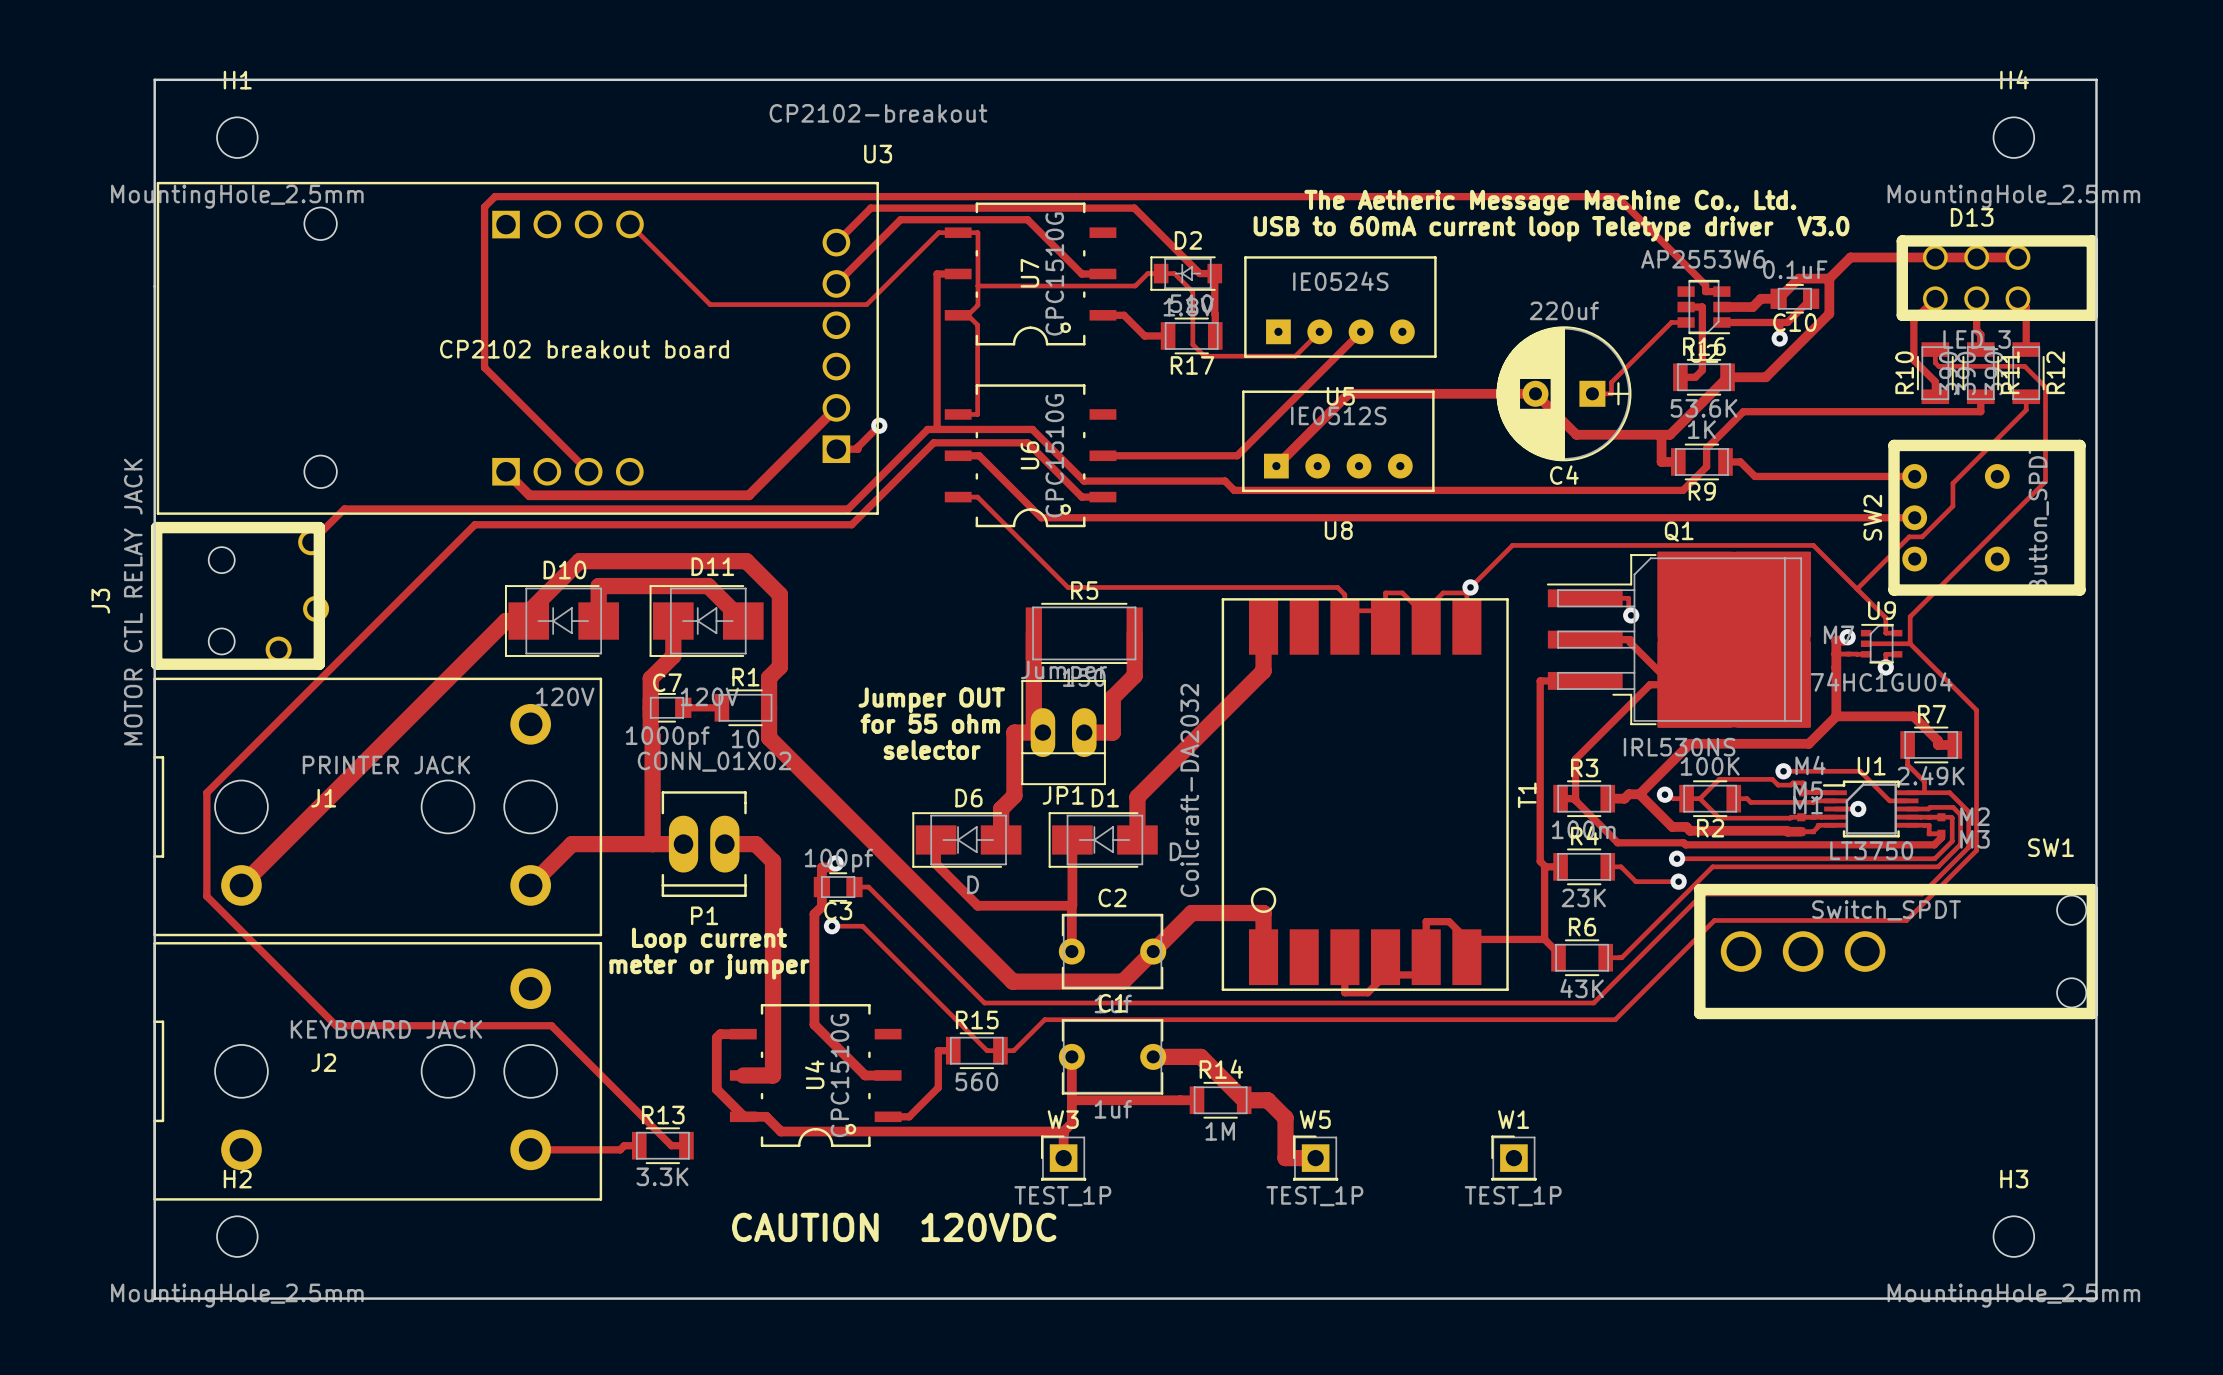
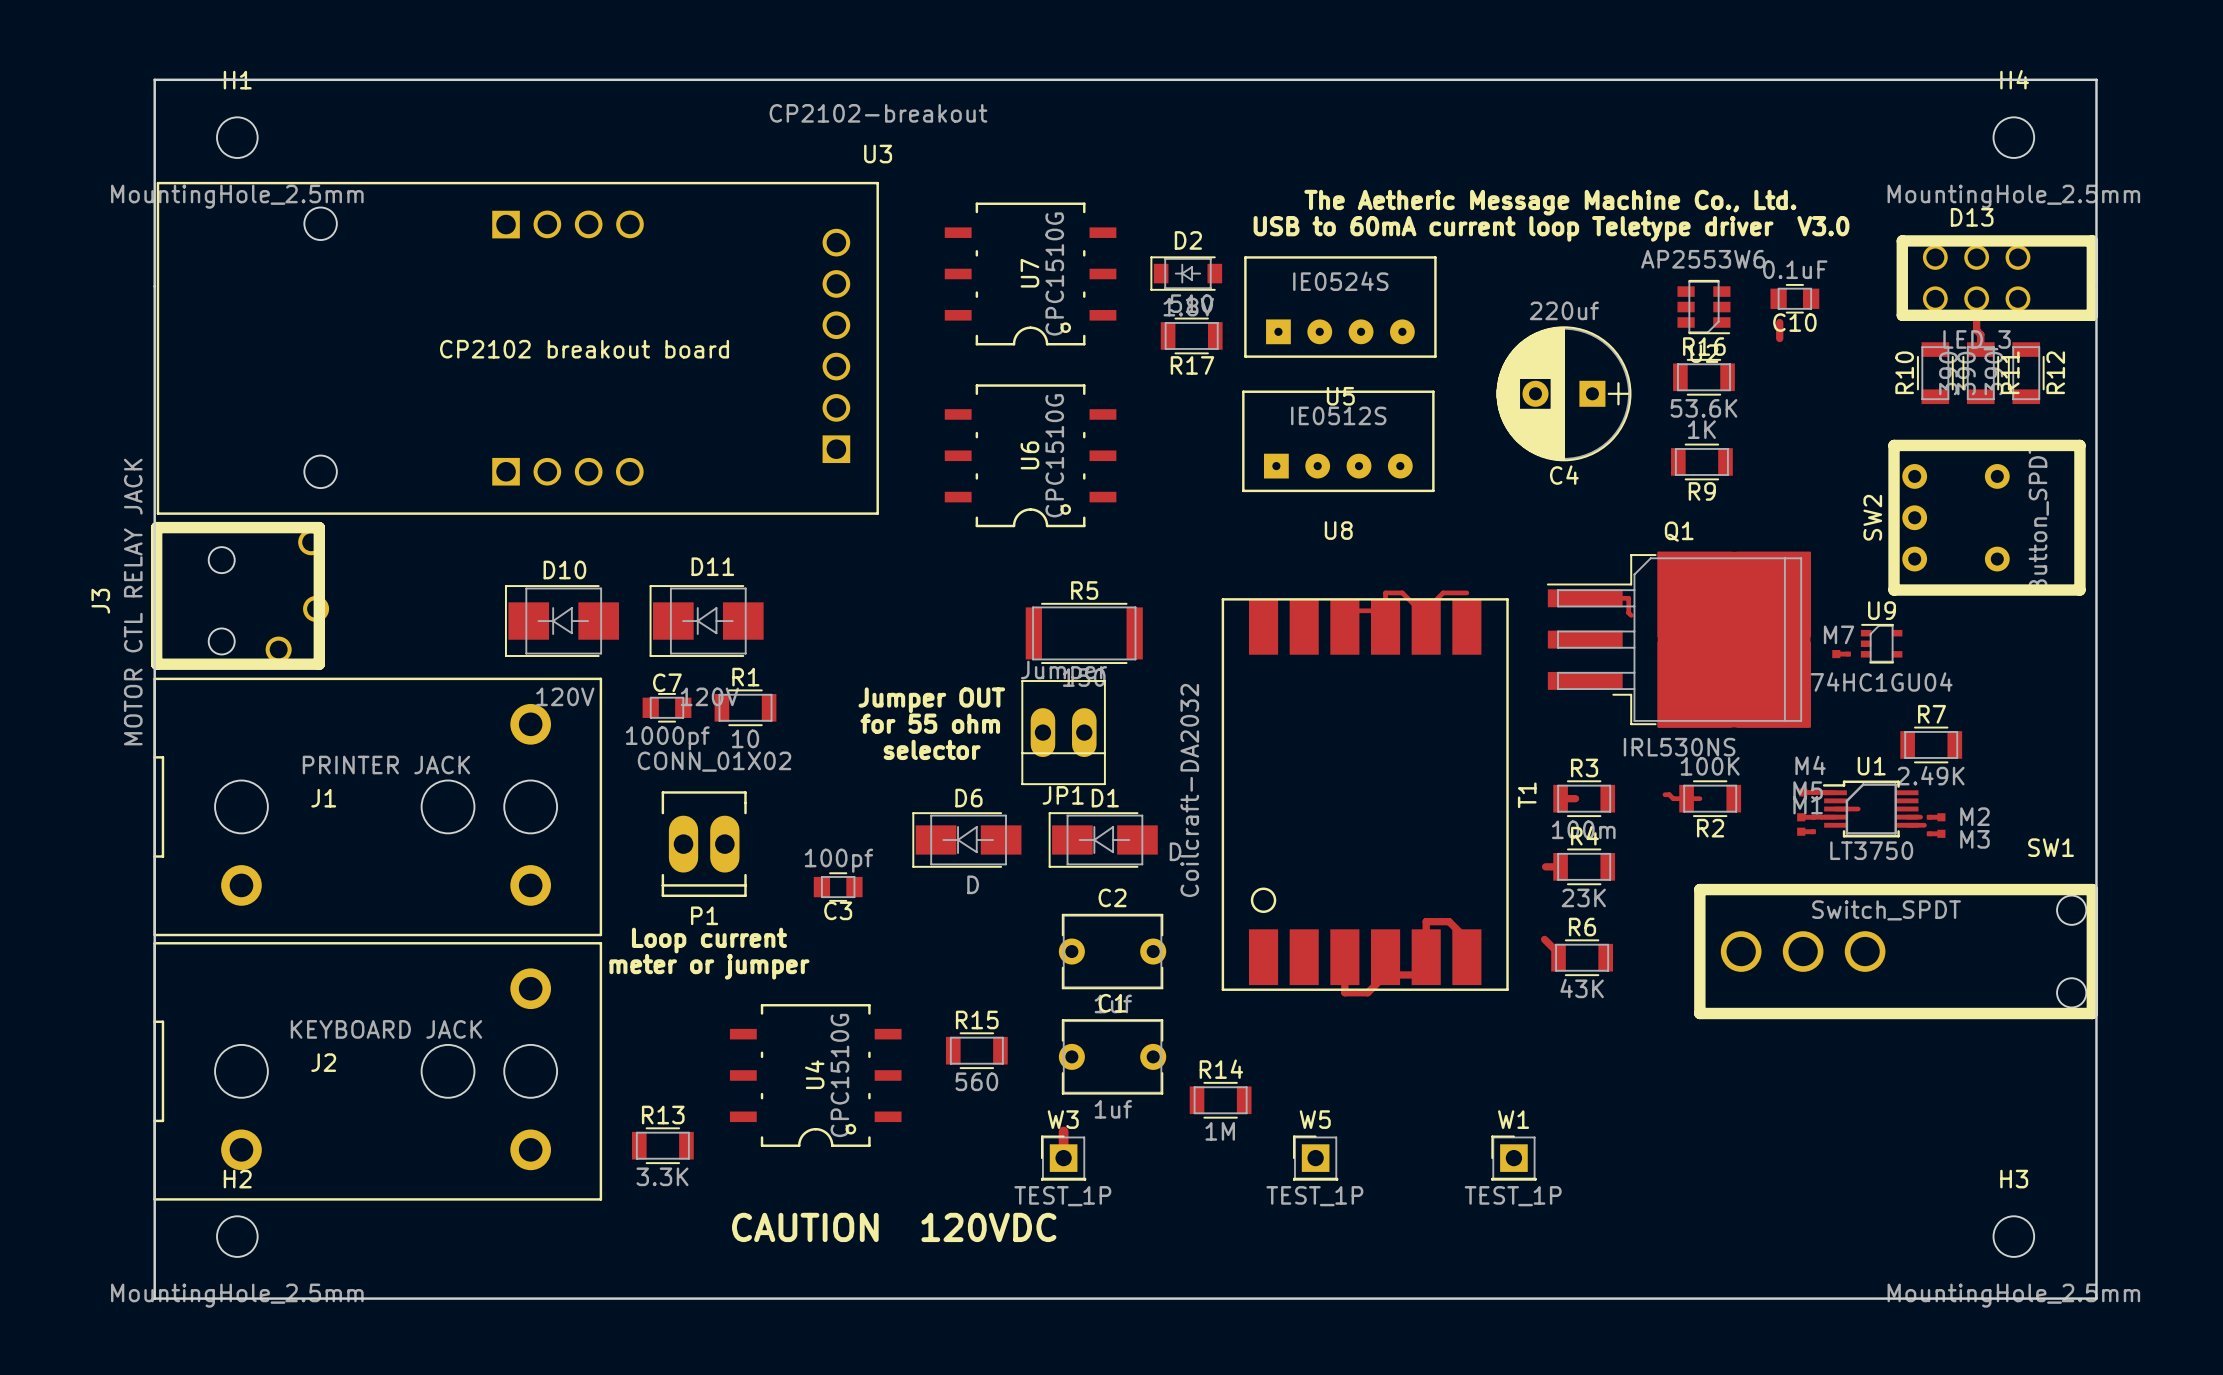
track: (629, 224) (710, 304) (866, 304) (938, 232) (977, 232) (977, 305) (967, 315) -> none
track: (836, 242) (870, 208) (1134, 208) (1199, 273) (1214, 273) (1215, 335) -> none
track: (2017, 257) (1850, 257) (1829, 278) -> none
track: (958, 273) (937, 273) (937, 429) -> none
track: (1102, 273) (1081, 273) (1027, 219) (900, 219) (836, 283) -> none
track: (1829, 278) (1798, 278) (1778, 298) (1761, 298) (1752, 307) (1721, 307) -> none
track: (1829, 278) (1829, 313) (1765, 377) (1727, 377) (1670, 434) (1576, 434) (1535, 393) (1348, 393) (1276, 466) -> none
track: (977, 286) (1135, 286) (1147, 273) (1174, 273) (1192, 291) (1192, 344) (1204, 356) (1295, 356) (1319, 331) -> none
track: (1721, 291) (1705, 291) (1705, 285) (1617, 196) (494, 196) (484, 207) (484, 367) (588, 471) -> none
track: (1811, 298) (1787, 322) (1721, 322) -> none
track: (1935, 298) (1913, 320) (1913, 360) (1935, 381) (1935, 396) -> none
track: (2017, 298) (2026, 307) (2026, 349) -> none
track: (1686, 307) (1702, 307) (1702, 370) (1695, 377) (1680, 377) -> none
track: (967, 315) (977, 325) (977, 414) (958, 414) -> none
track: (1102, 315) (1124, 315) (1144, 335) (1168, 335) -> none
track: (1686, 322) (1671, 322) (1611, 382) (1611, 393) (1592, 393) -> none
track: (1361, 331) (1237, 455) (1102, 455) -> none
via: (1779, 338) -> none
track: (1935, 349) (1935, 362) (1938, 366) (2024, 366) (2045, 387) (2045, 481) (1910, 616) (1910, 643) -> none
track: (1980, 396) (1980, 411) (1743, 411) (1706, 448) (1706, 466) (1683, 490) (1234, 490) (1224, 481) (1084, 481) (1032, 429) (927, 429) (848, 509) (344, 509) (311, 542) -> none
track: (2026, 396) (2026, 410) (1952, 483) (1952, 506) (1922, 536) (1909, 536) (1857, 589) -> none
track: (836, 407) (749, 495) (529, 495) (506, 471) -> none
track: (879, 425) (857, 449) (836, 449) -> none
via: (879, 425) -> none
track: (1661, 434) (1661, 461) (1678, 461) -> none
track: (958, 455) (979, 455) (1041, 517) (1914, 517) -> none
track: (1725, 461) (1740, 461) (1754, 476) (1914, 476) -> none
track: (958, 497) (977, 497) (1068, 587) (1337, 587) (1344, 594) (1344, 626) -> none
track: (1102, 497) (1081, 497) (1027, 442) (933, 442) (851, 524) (474, 524) (206, 792) (206, 896) (336, 1025) (551, 1025) (671, 1145) (686, 1145) -> none
via: (1470, 587) -> none
via: (1631, 615) -> none
track: (519, 621) (579, 561) (746, 561) (779, 594) (779, 666) (769, 677) (769, 737) (1012, 981) (1123, 981) (1191, 913) (1263, 913) (1263, 957) -> none
track: (528, 621) (505, 621) (241, 885) -> none
track: (598, 621) (598, 586) (708, 586) (743, 621) -> none
track: (673, 621) (673, 656) (650, 678) (652, 844) -> none
track: (1263, 626) (1263, 671) (1137, 797) (1137, 839) -> none
track: (1466, 626) (1466, 591) (1512, 545) (1813, 545) (1885, 617) (1885, 633) (1897, 633) -> none
track: (1033, 633) (1033, 732) -> none
track: (1134, 633) (1134, 675) (1112, 697) (1112, 732) (1084, 732) -> none
track: (1847, 637) (1844, 640) (1836, 640) (1836, 716) -> none
via: (1847, 637) -> none
track: (1585, 639) (1630, 639) (1630, 642) (1672, 684) -> none
track: (1866, 643) (1910, 643) -> none
track: (1910, 643) (1976, 710) (1976, 850) (1906, 920) (1714, 920) (1615, 1019) (1044, 1019) (1013, 1050) (987, 1050) (862, 926) (832, 926) -> none
track: (1848, 654) (1866, 654) -> none
track: (1897, 654) (1885, 654) (1885, 667) -> none
via: (1885, 667) -> none
track: (1585, 680) (1540, 680) (1540, 861) (1545, 866) (1544, 939) (1466, 939) (1466, 957) -> none
track: (1694, 684) (1649, 684) (1575, 759) (1575, 800) (1617, 842) (1683, 842) (1685, 844) (1934, 844) (1941, 837) (1941, 833) -> none
track: (683, 707) (721, 707) -> none
track: (1836, 716) (1913, 716) (1938, 740) (1938, 744) (1954, 744) -> none
track: (1836, 716) (1808, 743) (1690, 743) (1639, 794) -> none
track: (1042, 732) (1014, 732) (1014, 795) (1001, 809) (1001, 839) -> none
track: (1907, 744) (1907, 764) (1924, 781) (1924, 792) -> none
track: (1783, 771) (1860, 771) (1889, 800) (1907, 800) -> none
via: (1783, 771) -> none
track: (1803, 792) (1803, 782) (1778, 785) (1772, 779) (1719, 779) (1699, 798) (1719, 818) (1801, 817) -> none
track: (1907, 792) (1949, 792) (1968, 811) (1968, 847) (1922, 894) (1702, 894) (1593, 1003) (984, 1003) (868, 887) (854, 887) -> none
track: (1639, 794) (1628, 794) (1624, 798) (1607, 798) -> none
track: (1639, 794) (1672, 826) (1686, 826) (1690, 830) (1801, 831) -> none
via: (1664, 794) -> none
track: (1733, 798) (1747, 798) (1750, 802) (1835, 800) -> none
via: (1858, 809) -> none
track: (1907, 809) (1953, 807) (1960, 814) (1960, 844) (1938, 866) (1712, 866) (1621, 957) (1605, 957) -> none
track: (1920, 817) (1929, 817) -> none
track: (1941, 817) (1952, 818) (1952, 841) (1934, 858) (1677, 858) -> none
track: (1835, 825) (1818, 825) (1813, 831) -> none
track: (1924, 825) (1929, 825) (1929, 833) -> none
track: (936, 839) (936, 864) (977, 905) (1071, 905) -> none
track: (1072, 839) (1071, 905) -> none
track: (683, 844) (571, 844) (530, 885) -> none
track: (724, 844) (755, 844) (773, 861) (773, 1075) (743, 1075) -> none
via: (1677, 858) -> none
track: (835, 863) (831, 867) (821, 867) (821, 906) (814, 914) (814, 1024) (865, 1075) (888, 1075) -> none
via: (835, 863) -> none
track: (1607, 866) (1621, 866) (1635, 881) (1678, 881) -> none
via: (1678, 881) -> none
track: (1071, 905) (1071, 951) -> none
via: (832, 926) -> none
track: (743, 1034) (720, 1034) (716, 1037) (716, 1089) (744, 1116) -> none
track: (953, 1050) (938, 1050) (938, 1087) (909, 1116) (888, 1116) -> none
track: (1071, 1056) (1071, 1123) (1063, 1131) (780, 1131) (766, 1116) (743, 1116) -> none
track: (1153, 1056) (1200, 1056) (1244, 1100) (1267, 1100) (1285, 1118) (1285, 1158) (1315, 1158) -> none
track: (1071, 1100) (1197, 1100) -> none
track: (639, 1145) (624, 1145) (620, 1149) (530, 1149) -> none

